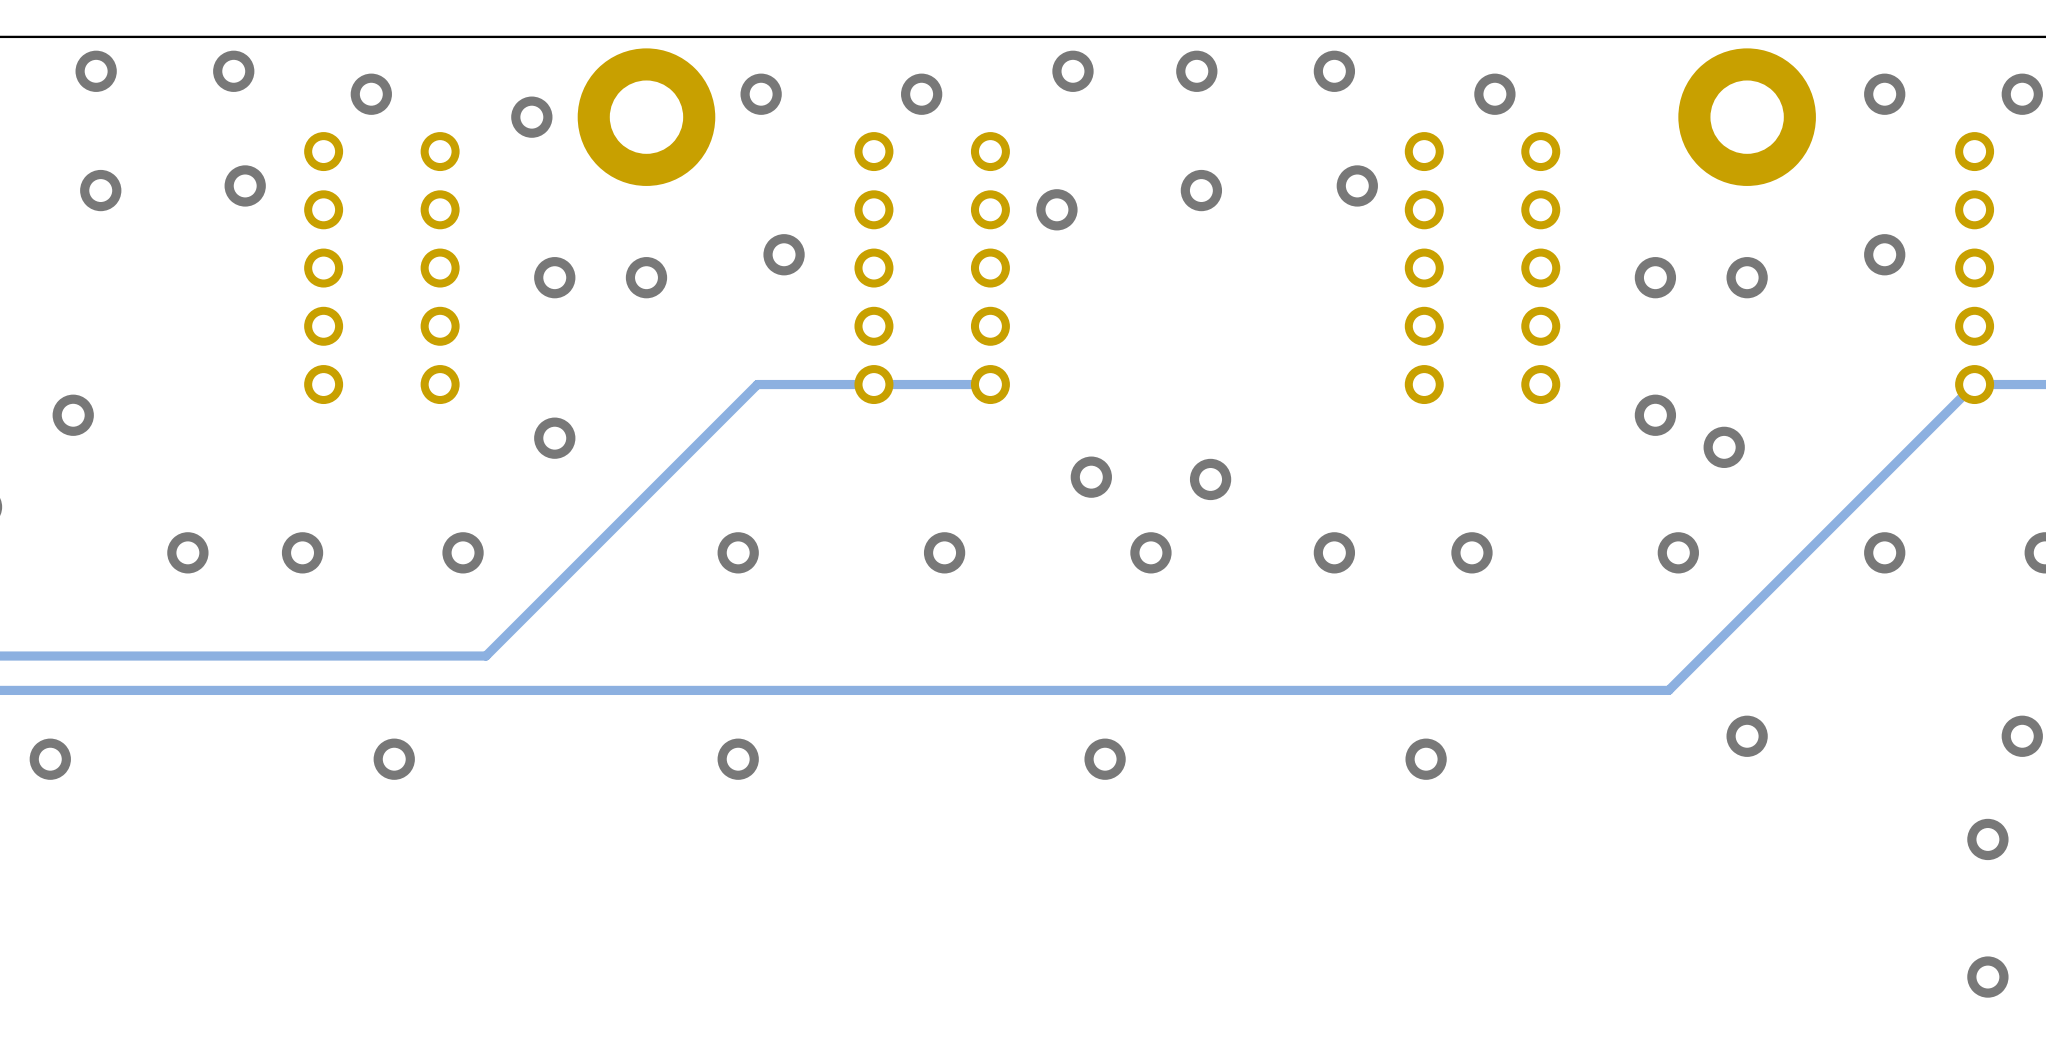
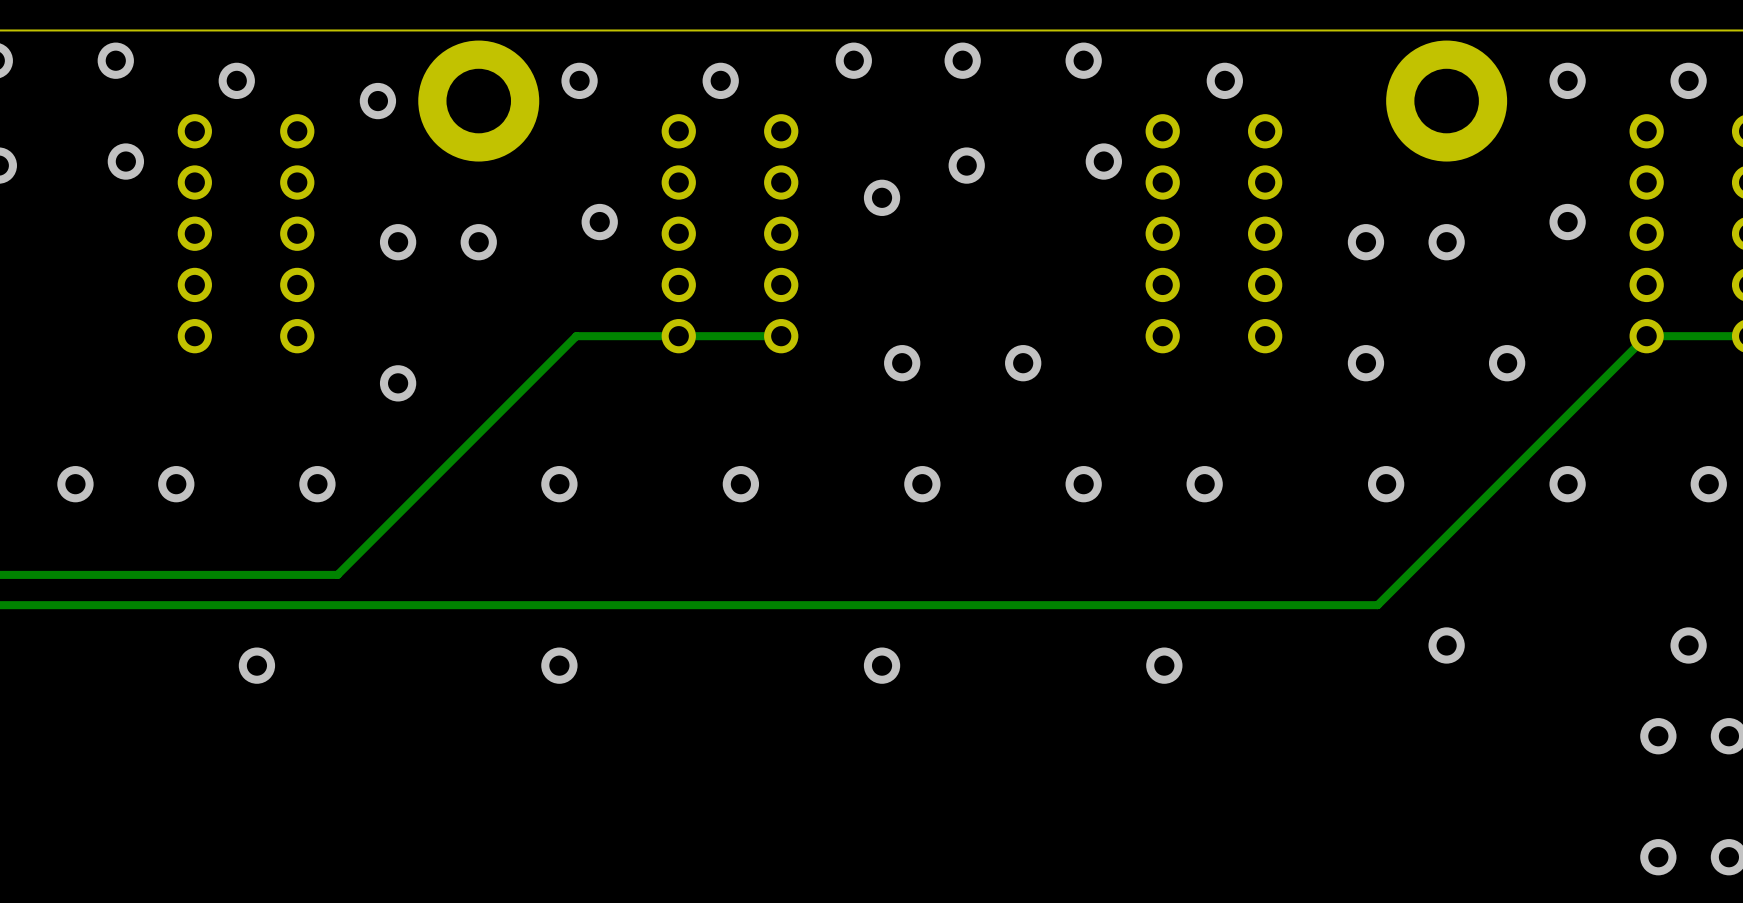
via position: (1056, 209) -> (882, 197)
via: none -> (902, 363)
via: none -> (1023, 363)
via position: (1724, 447) -> (1507, 363)
via: (1091, 477) -> none
via: (1210, 479) -> none

